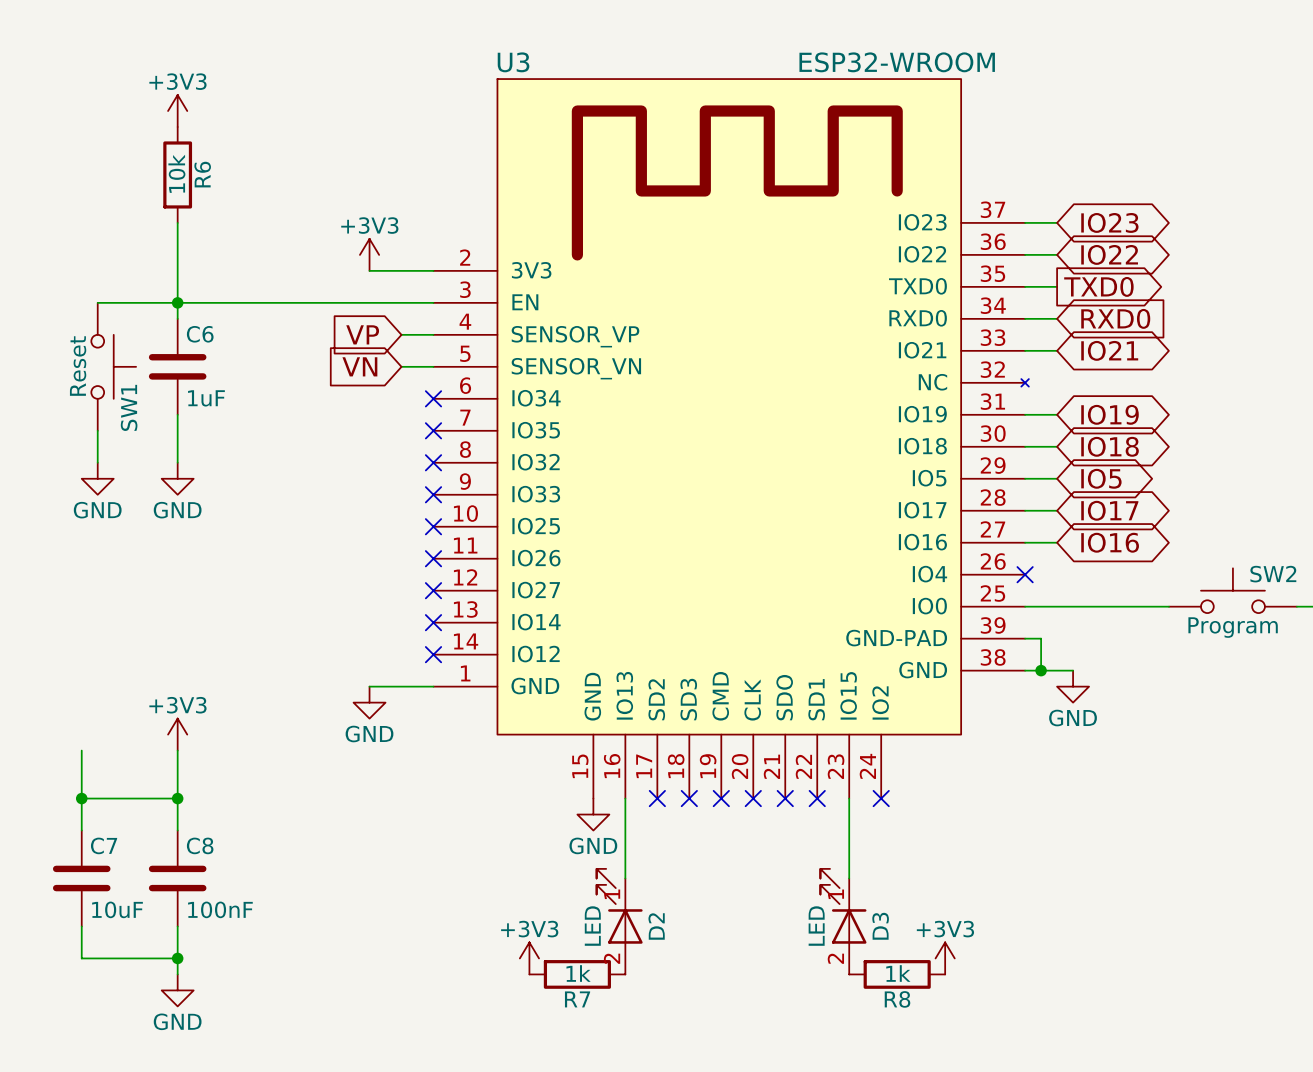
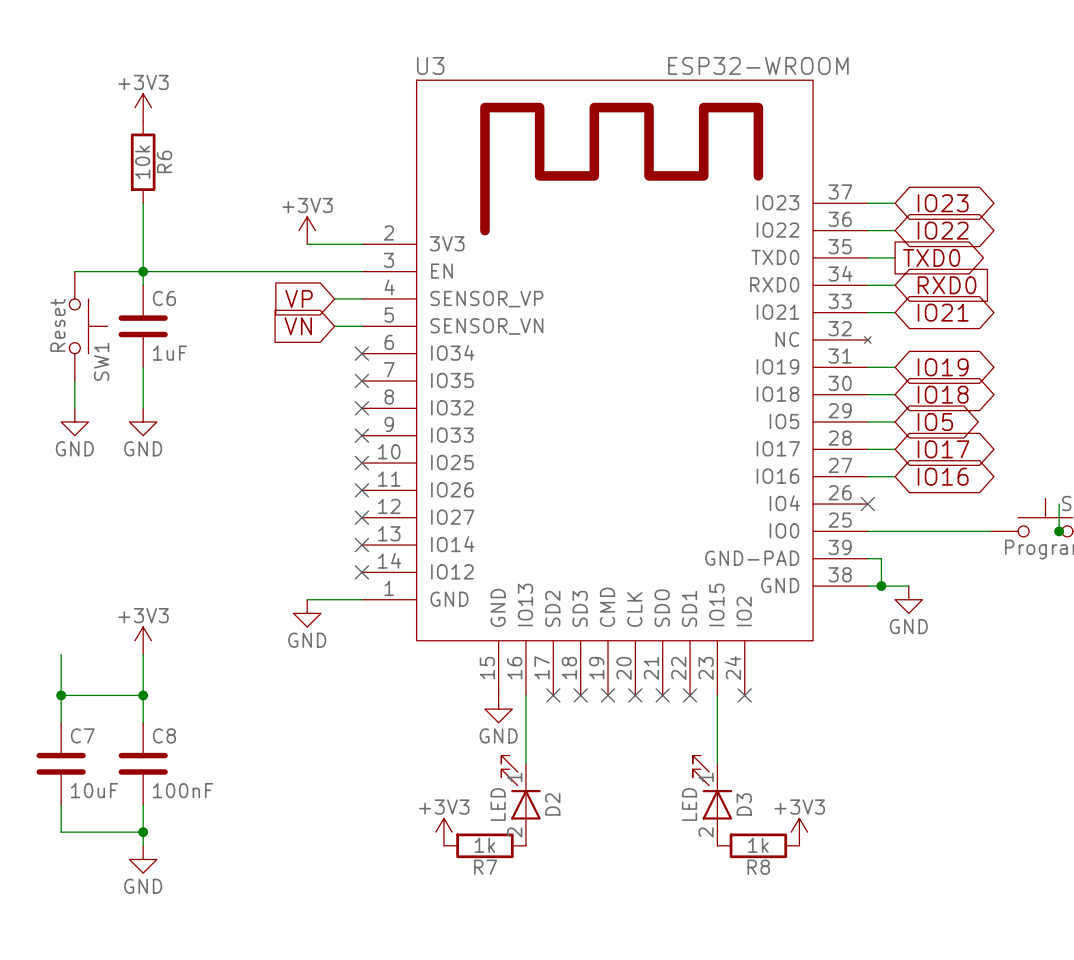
wire: none -> (1059, 504) (1059, 531)
junction: none -> (1059, 531)

